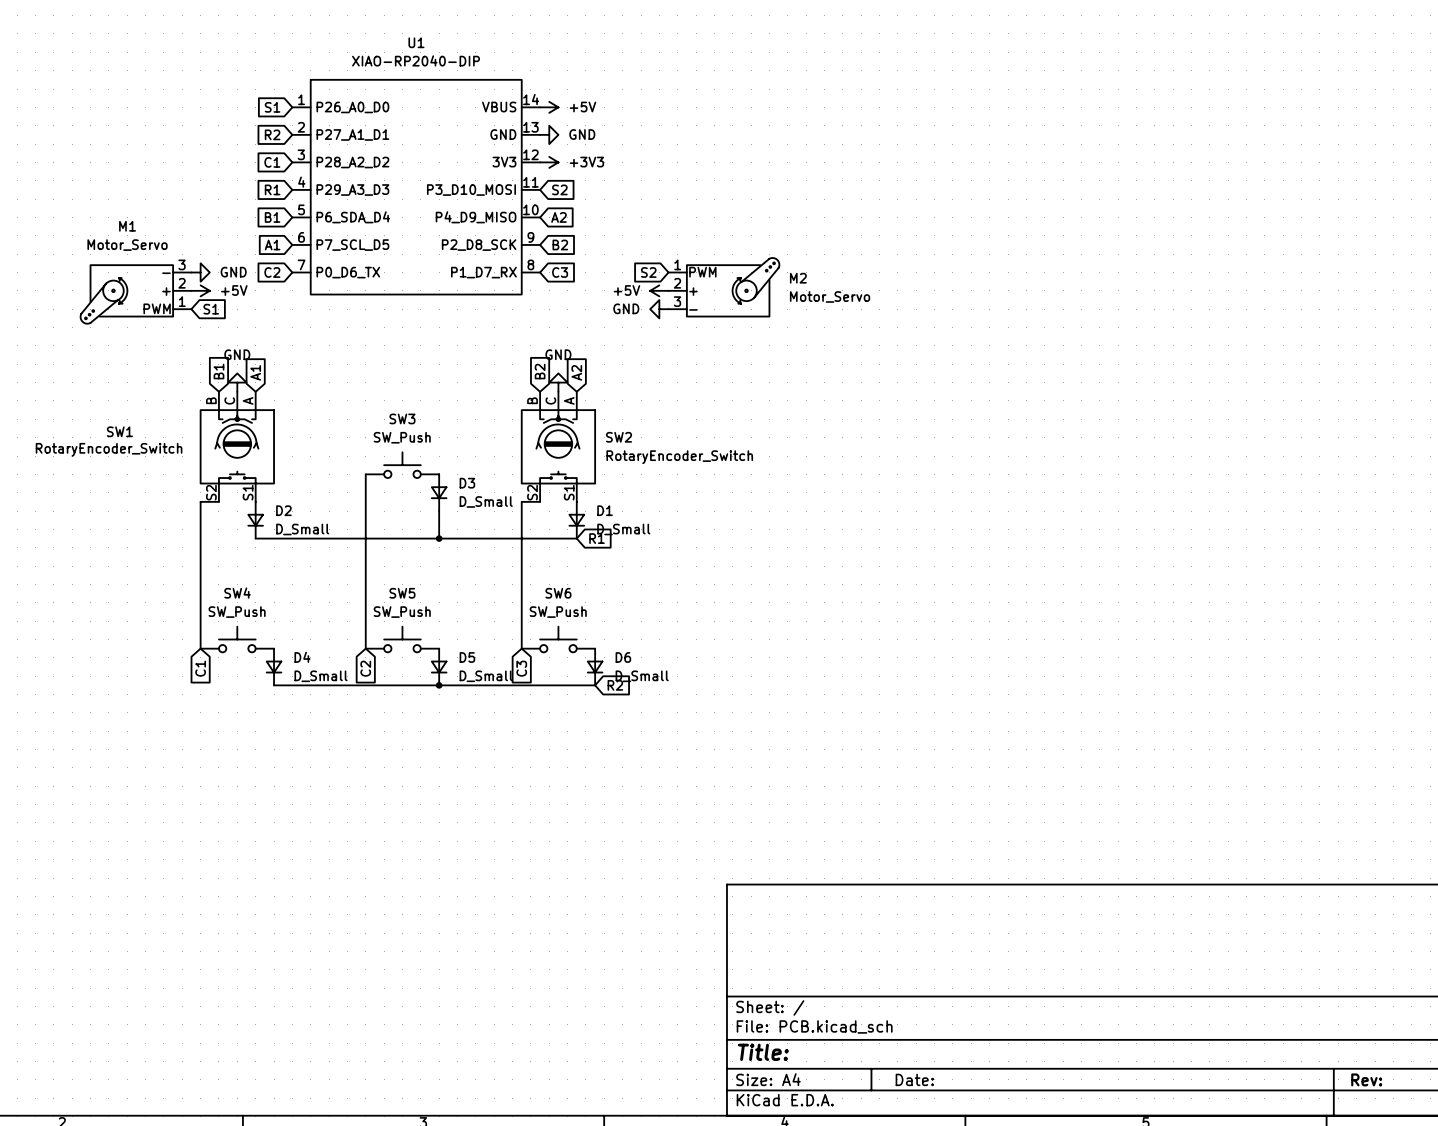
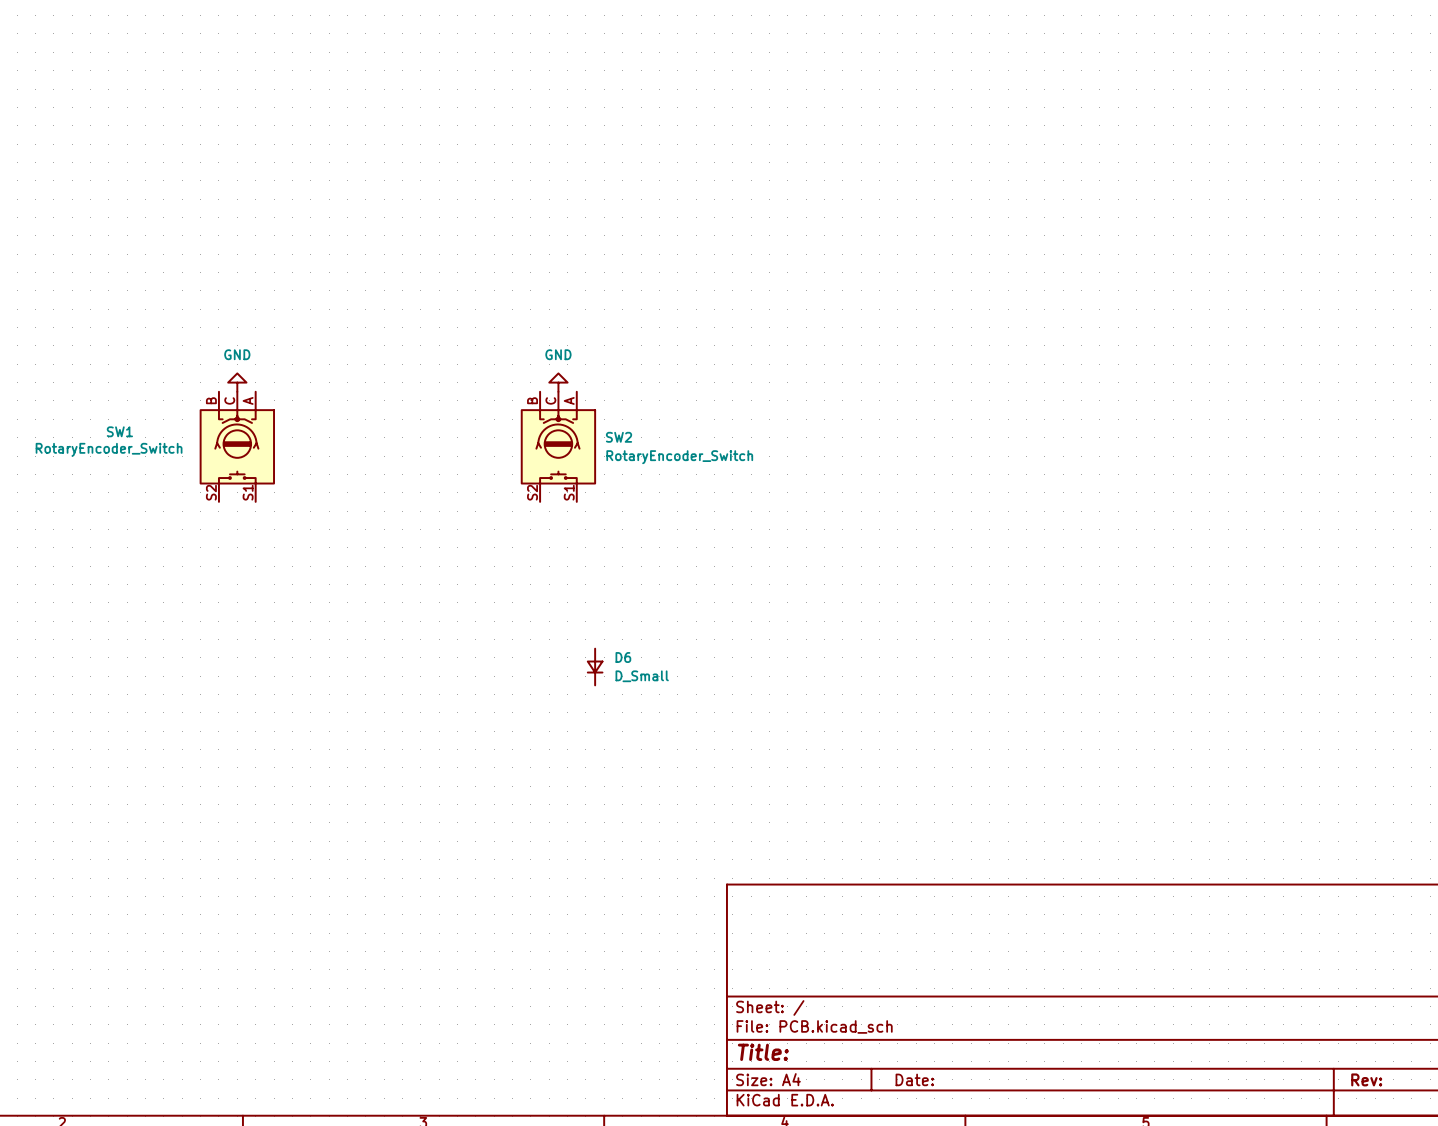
global label: S1 (272, 107) -> none
power symbol: +5V (549, 107) -> none
global label: R2 (272, 134) -> none
power symbol: GND (549, 134) -> none
global label: C1 (272, 162) -> none
power symbol: +3V3 (549, 162) -> none
U1: XIAO-RP2040-DIP (416, 187) -> none
global label: R1 (272, 189) -> none
global label: S2 (559, 189) -> none
global label: B1 (272, 217) -> none
global label: A2 (558, 217) -> none
global label: A1 (272, 244) -> none
global label: B2 (560, 244) -> none
power symbol: GND (200, 272) -> none
global label: C2 (272, 272) -> none
global label: C3 (560, 272) -> none
global label: S2 (648, 272) -> none
M2: Motor_Servo (723, 287) -> none
power symbol: +5V (200, 290) -> none
power symbol: +5V (659, 290) -> none
M1: Motor_Servo (136, 293) -> none
global label: S1 (211, 309) -> none
power symbol: GND (659, 309) -> none
global label: B1 (218, 371) -> none
global label: B2 (540, 371) -> none
global label: A1 (255, 372) -> none
global label: A2 (576, 372) -> none
SW3: SW_Push (402, 465) -> none
wire: (365, 474) (365, 648) -> none
D3: D_Small (439, 492) -> none
wire: (218, 501) (200, 501) (200, 648) -> none
wire: (540, 501) (521, 501) (521, 648) -> none
wire: (439, 511) (439, 538) -> none
D2: D_Small (255, 520) -> none
D1: D_Small (576, 520) -> none
wire: (255, 538) (576, 538) -> none
junction: (439, 538) -> none
global label: R1 (597, 538) -> none
SW4: SW_Push (237, 639) -> none
SW5: SW_Push (402, 639) -> none
SW6: SW_Push (558, 639) -> none
D4: D_Small (274, 667) -> none
D5: D_Small (439, 667) -> none
global label: C1 (200, 668) -> none
global label: C2 (365, 668) -> none
global label: C3 (521, 668) -> none
wire: (274, 685) (595, 685) -> none
junction: (439, 685) -> none
global label: R2 (615, 685) -> none

